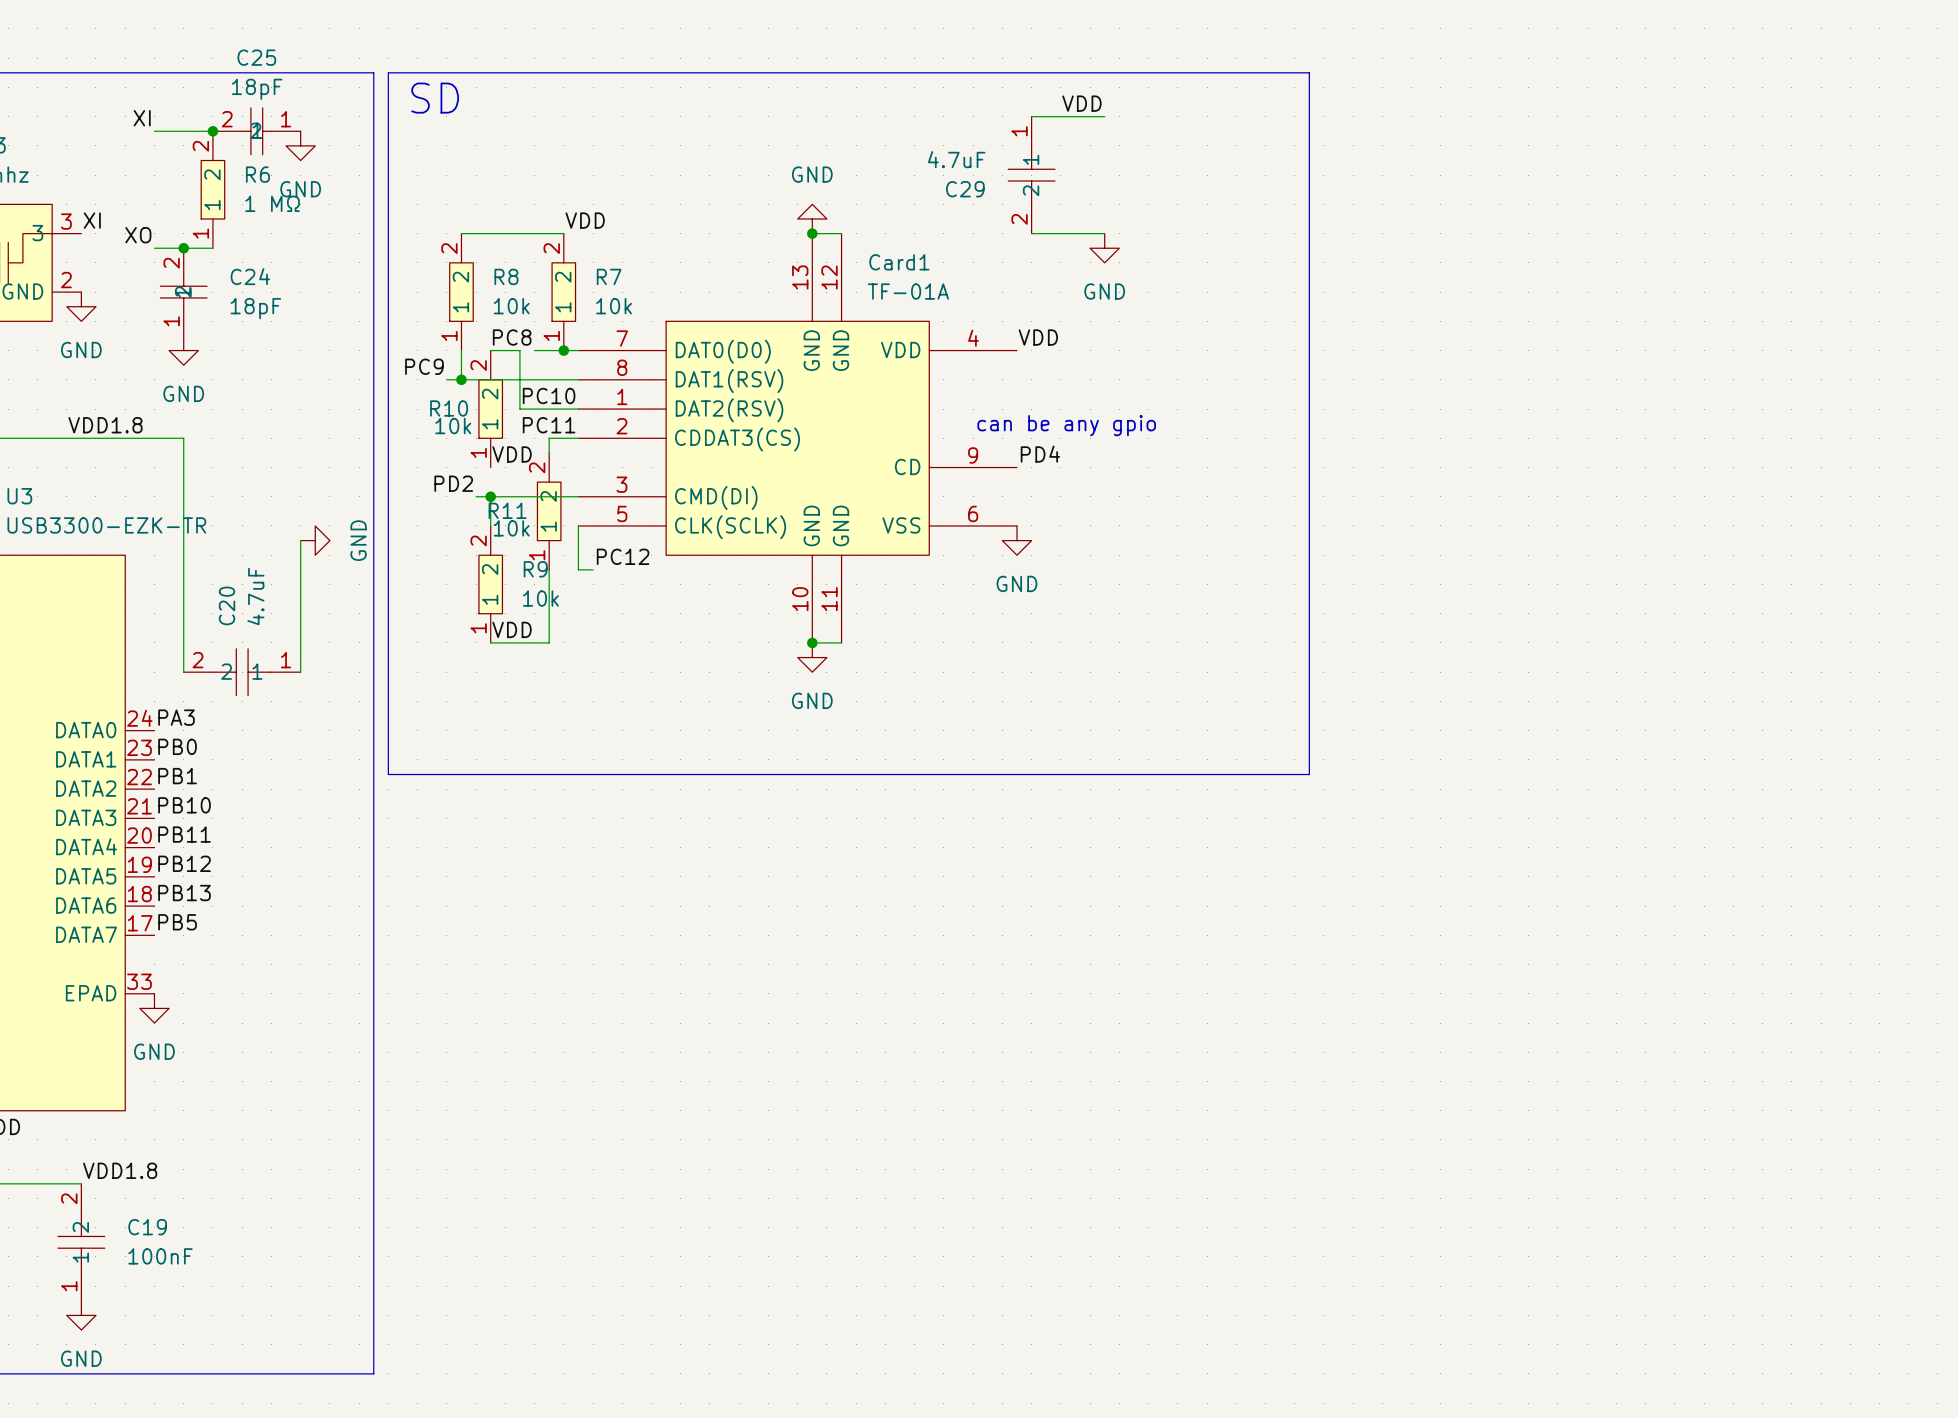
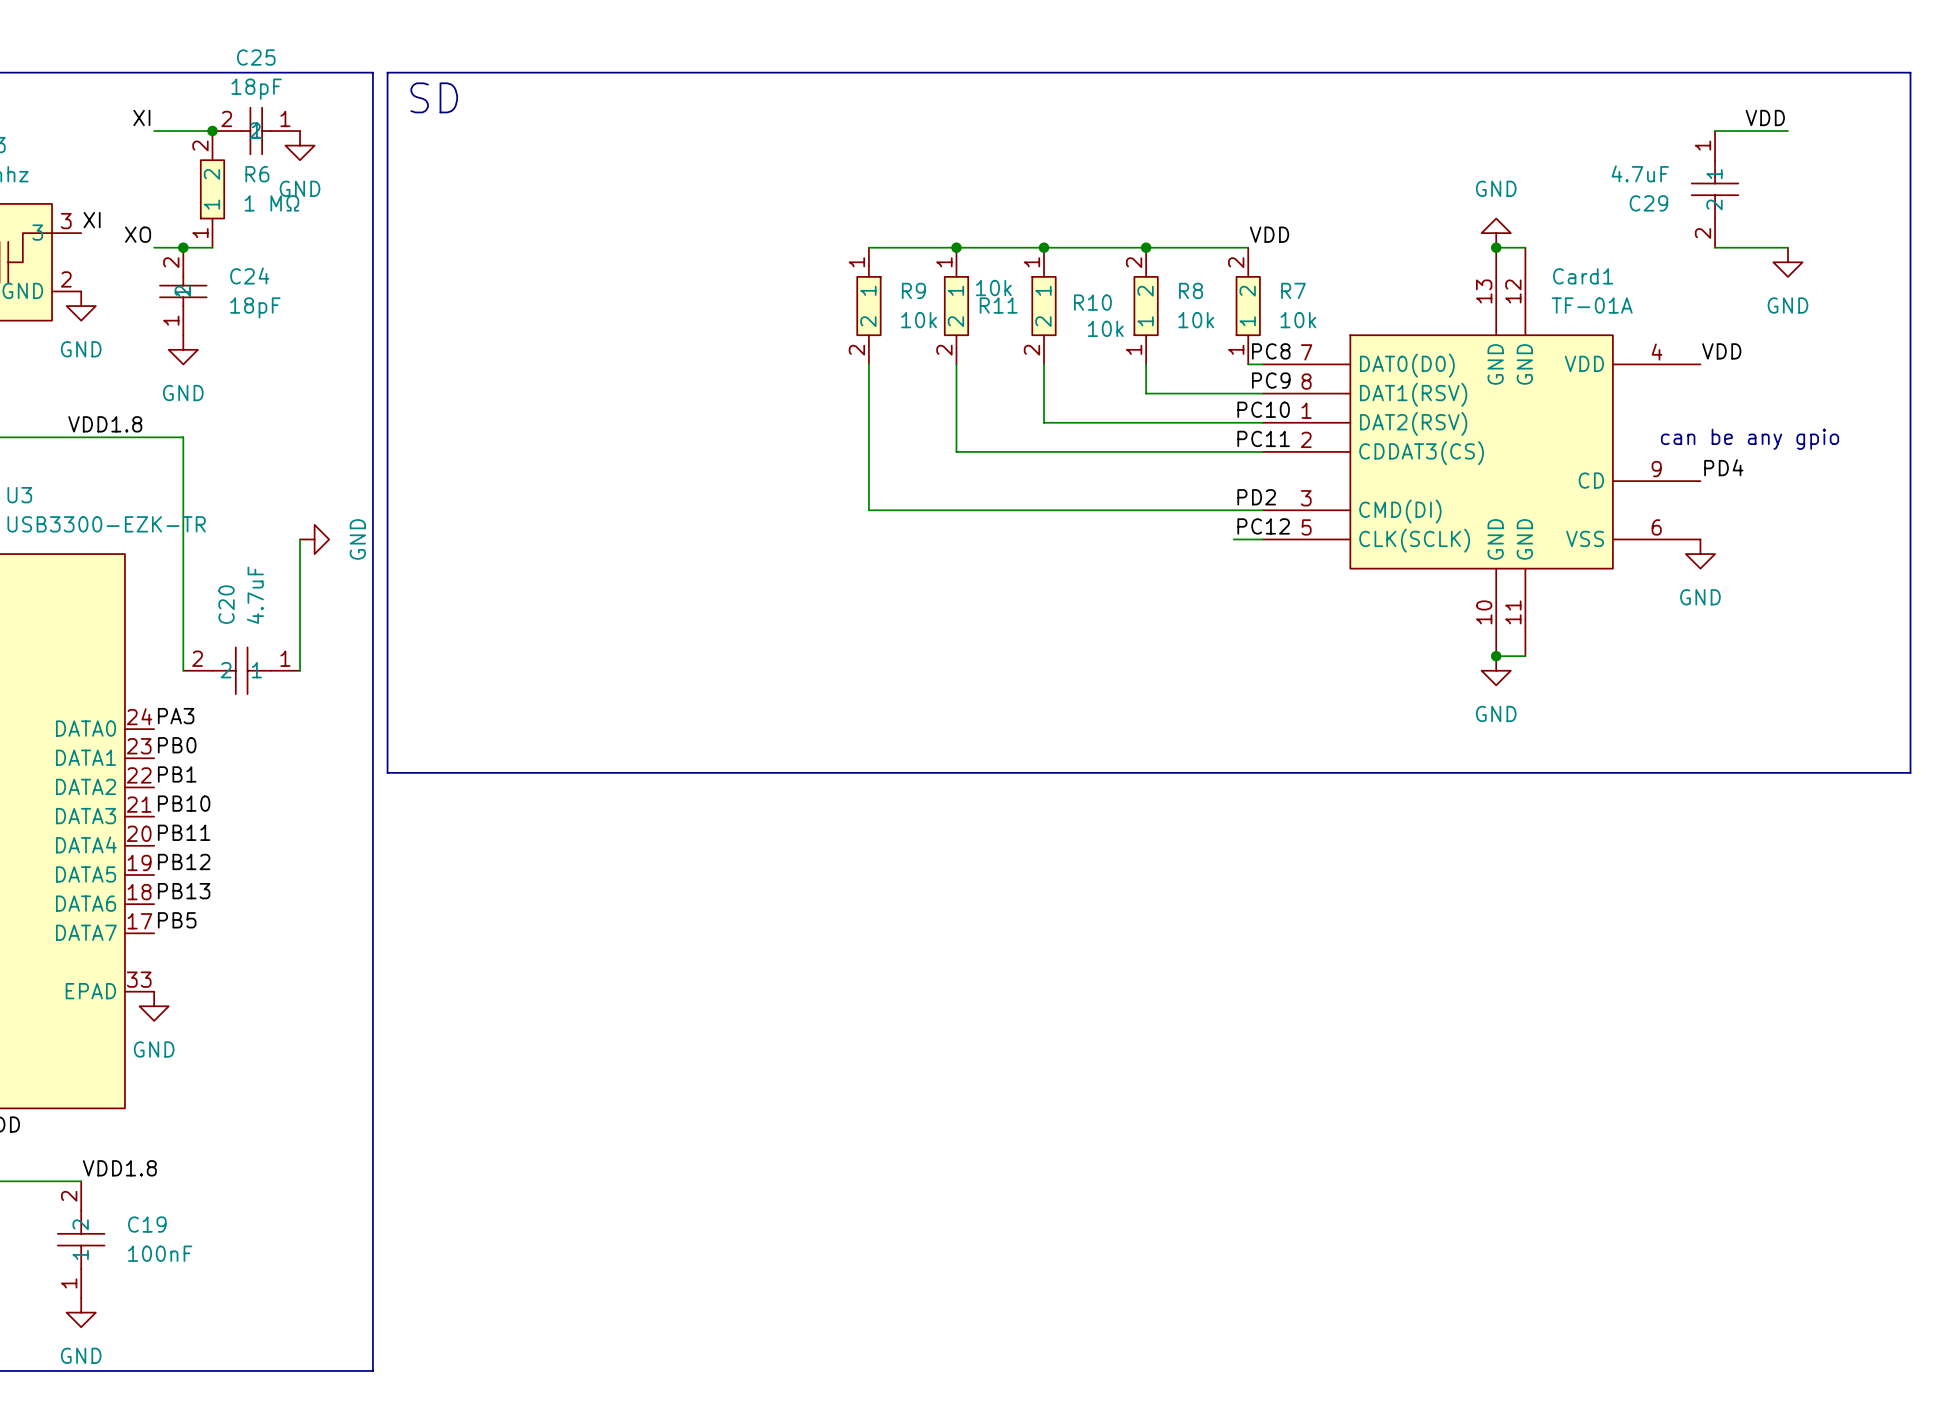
line: (1309, 72) (1309, 774) -> (1306, 72) (1910, 72) (1910, 772) (1306, 772)
label: VDD (1081, 103) -> none
wire: (1031, 116) (1104, 116) -> none
label: none -> VDD (1765, 117)
wire: none -> (1715, 131) (1787, 131)
C29 position: (1031, 175) -> (1715, 189)
power symbol: GND (812, 219) -> none
label: VDD (585, 220) -> none
wire: (461, 233) (563, 233) -> none
wire: (812, 233) (841, 233) -> none
junction: (812, 233) -> none
wire: (1031, 233) (1104, 233) -> none
power symbol: none -> GND (1496, 233)
label: none -> VDD (1269, 234)
wire: none -> (868, 247) (1248, 247)
junction: none -> (956, 247)
junction: none -> (1044, 247)
power symbol: GND (1104, 248) -> none
junction: none -> (1146, 247)
wire: none -> (1496, 247) (1525, 247)
junction: none -> (1496, 247)
wire: none -> (1715, 247) (1787, 247)
power symbol: none -> GND (1787, 262)
R8 position: (461, 292) -> (1146, 306)
R7 position: (563, 292) -> (1248, 306)
label: PC8 (512, 337) -> none
label: VDD (1038, 337) -> none
wire: (461, 350) (461, 379) -> none
wire: (490, 350) (519, 350) (519, 409) (578, 409) -> none
wire: (534, 350) (578, 350) -> none
junction: (563, 350) -> none
label: none -> PC8 (1271, 351)
label: none -> VDD (1721, 351)
wire: none -> (868, 364) (868, 510) (1262, 510)
wire: none -> (956, 364) (956, 451) (1262, 451)
wire: none -> (1044, 364) (1044, 422) (1262, 422)
wire: none -> (1146, 364) (1146, 393) (1262, 393)
wire: none -> (1248, 364) (1262, 364)
label: PC9 (424, 366) -> none
wire: (446, 379) (578, 379) -> none
junction: (461, 379) -> none
label: none -> PC9 (1271, 380)
label: PC10 (549, 396) -> none
R10 rotation: 0° (490, 409) -> 180° (1044, 306)
R10 position: (490, 409) -> (1044, 306)
label: none -> PC10 (1263, 409)
label: PC11 (549, 425) -> none
text: can be any gpio (1066, 425) -> none
R10 value position: 10k (453, 426) -> 10k (1105, 328)
wire: (578, 438) (549, 438) (549, 452) -> none
Card1 position: (797, 438) -> (1481, 451)
label: none -> PC11 (1263, 438)
text: none -> can be any gpio (1750, 439)
label: VDD (512, 454) -> none
label: PD4 (1040, 454) -> none
label: none -> PD4 (1723, 467)
label: PD2 (453, 483) -> none
wire: (476, 496) (578, 496) -> none
wire: (490, 496) (490, 525) -> none
junction: (490, 496) -> none
label: none -> PD2 (1256, 497)
R11 rotation: 0° (549, 511) -> 180° (956, 306)
R11 position: (549, 511) -> (956, 306)
wire: (578, 525) (578, 569) (593, 569) -> none
label: none -> PC12 (1263, 526)
power symbol: GND (1016, 540) -> none
wire: none -> (1233, 539) (1262, 539)
power symbol: none -> GND (1700, 554)
label: PC12 (623, 556) -> none
wire: (549, 569) (549, 642) (490, 642) -> none
R9 rotation: 0° (490, 584) -> 180° (868, 306)
R9 position: (490, 584) -> (868, 306)
label: VDD (512, 629) -> none
wire: (812, 642) (841, 642) -> none
junction: (812, 642) -> none
power symbol: GND (812, 657) -> none
wire: none -> (1496, 656) (1525, 656)
junction: none -> (1496, 656)
power symbol: none -> GND (1496, 670)

